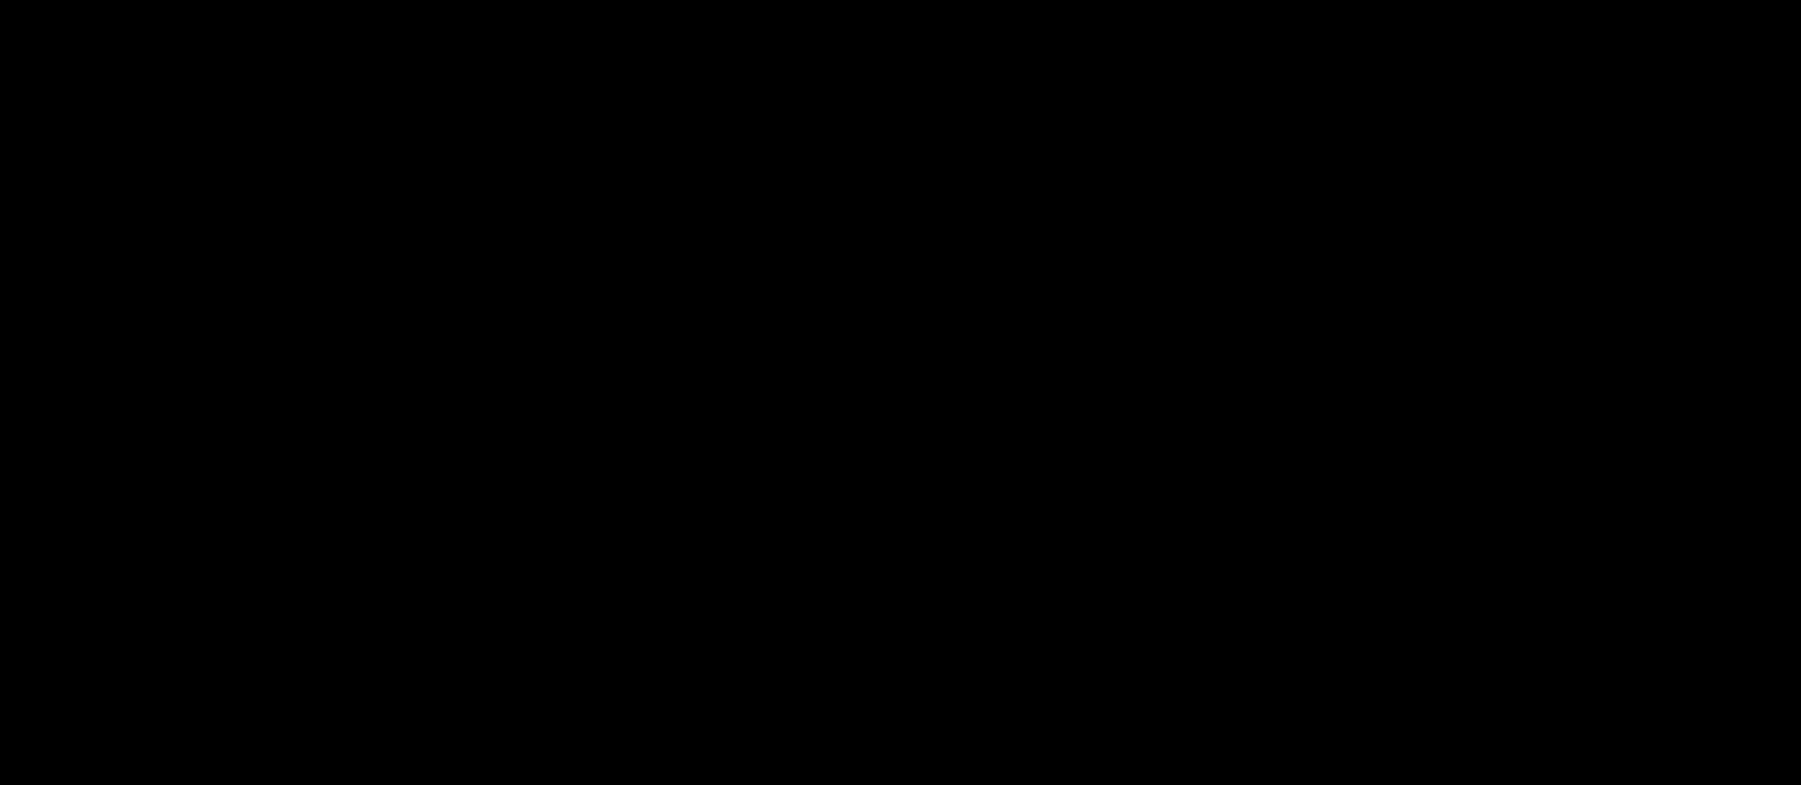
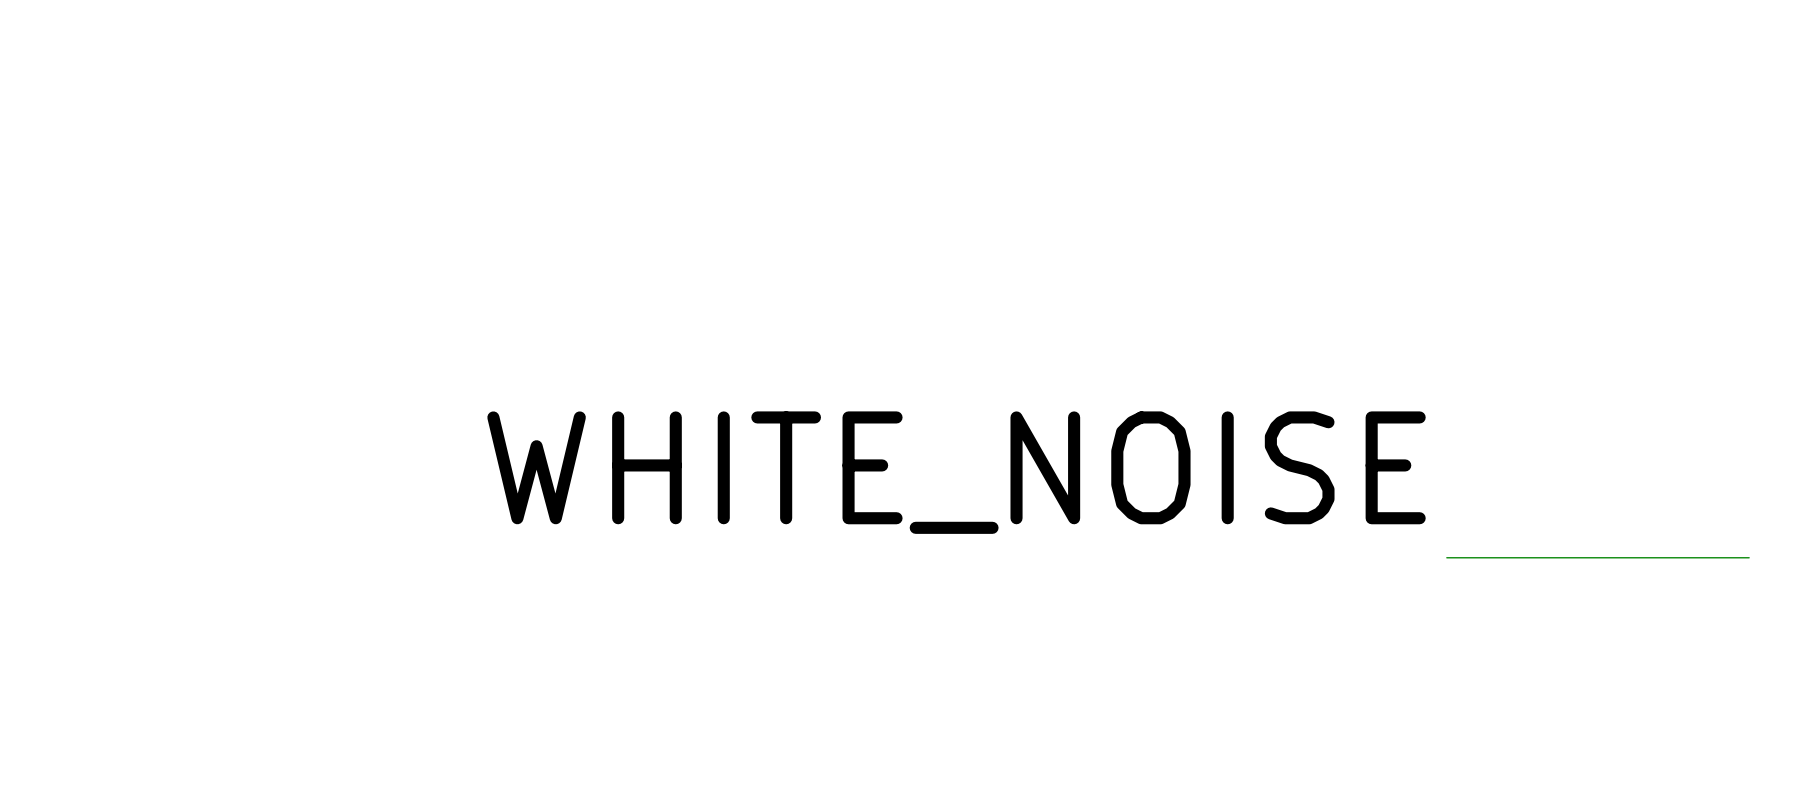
label: none -> WHITE_NOISE (956, 472)
wire: none -> (1446, 557) (1749, 557)

